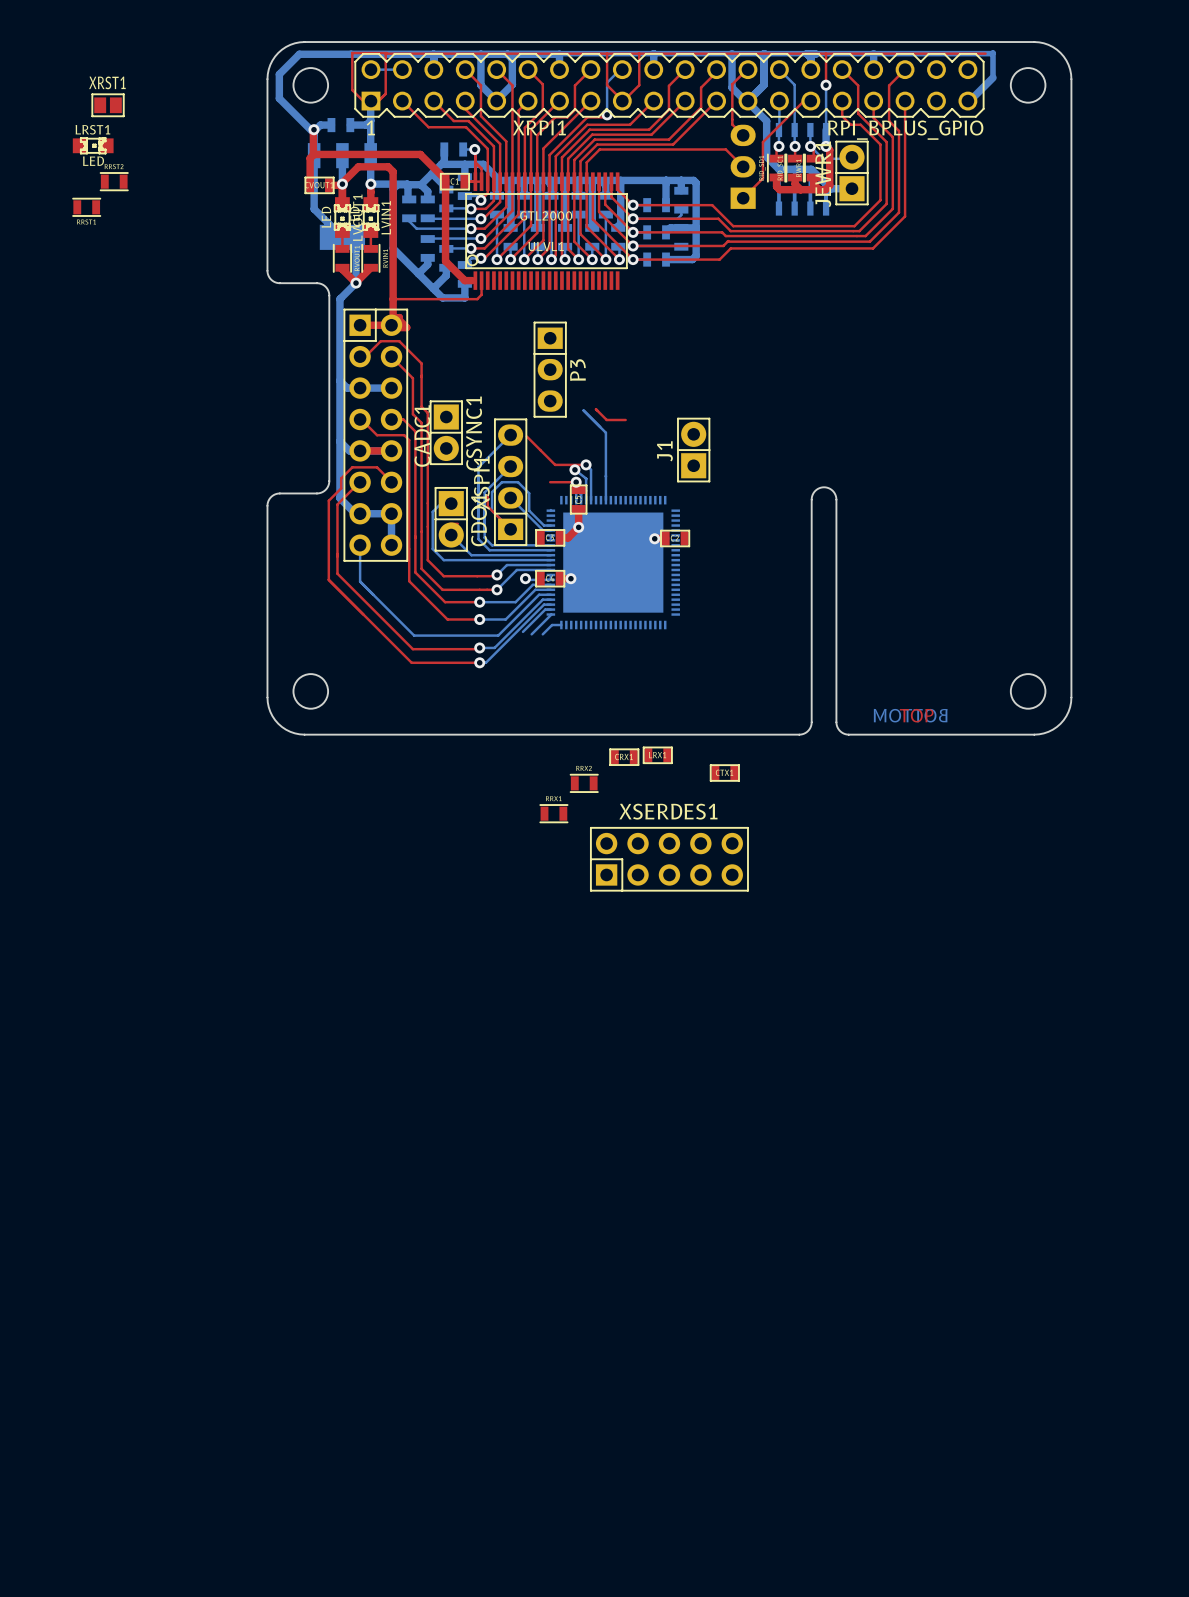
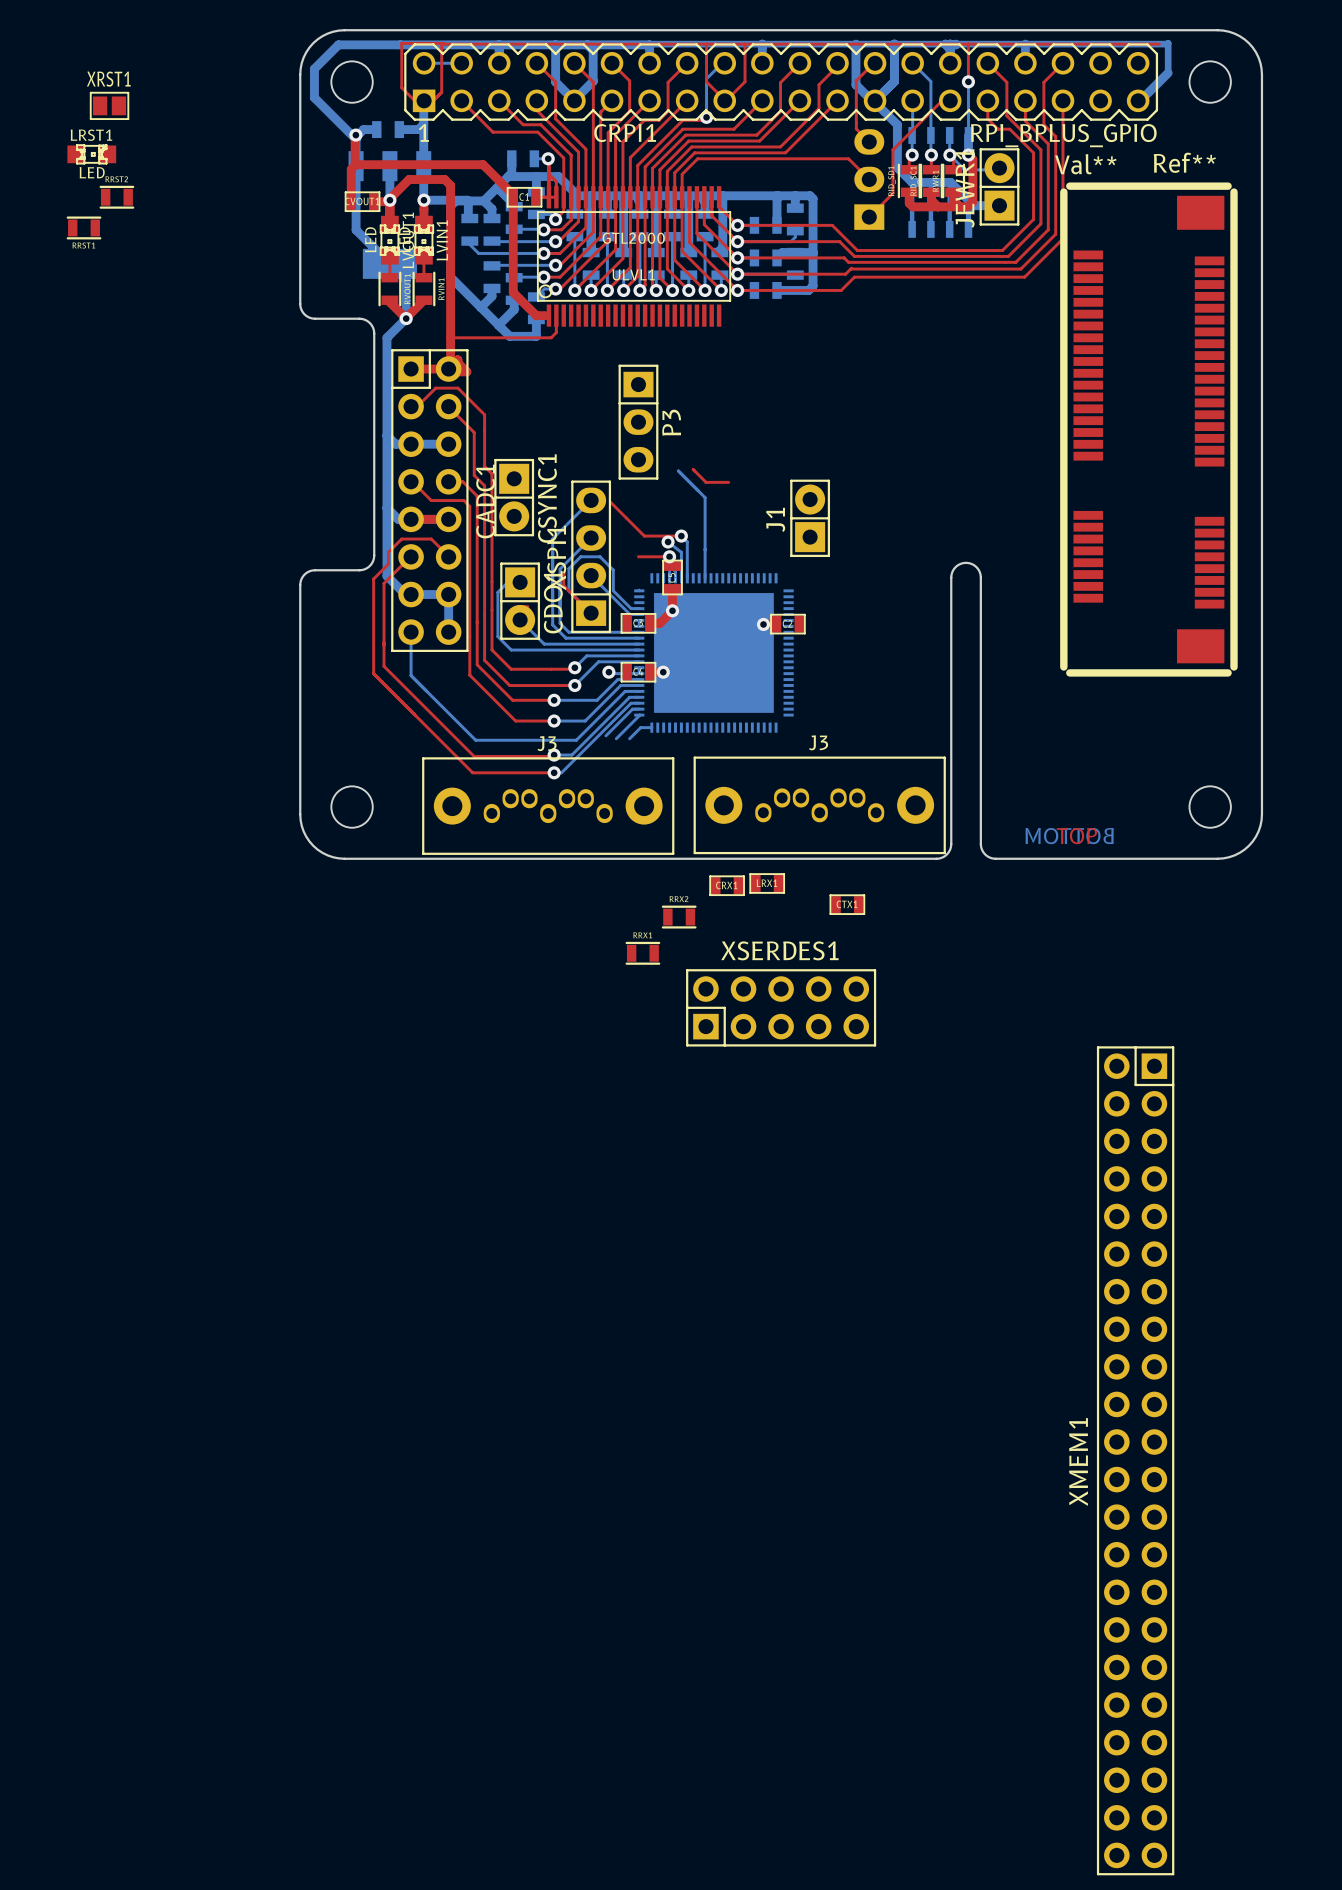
XRPI1 name: XRPI1 (539, 127) -> CRPI1 (625, 133)
Ref**: none -> Val** (1148, 429)
J3: none -> (548, 806)
J3: none -> (819, 805)
XMEM1: none -> (1135, 1460)

